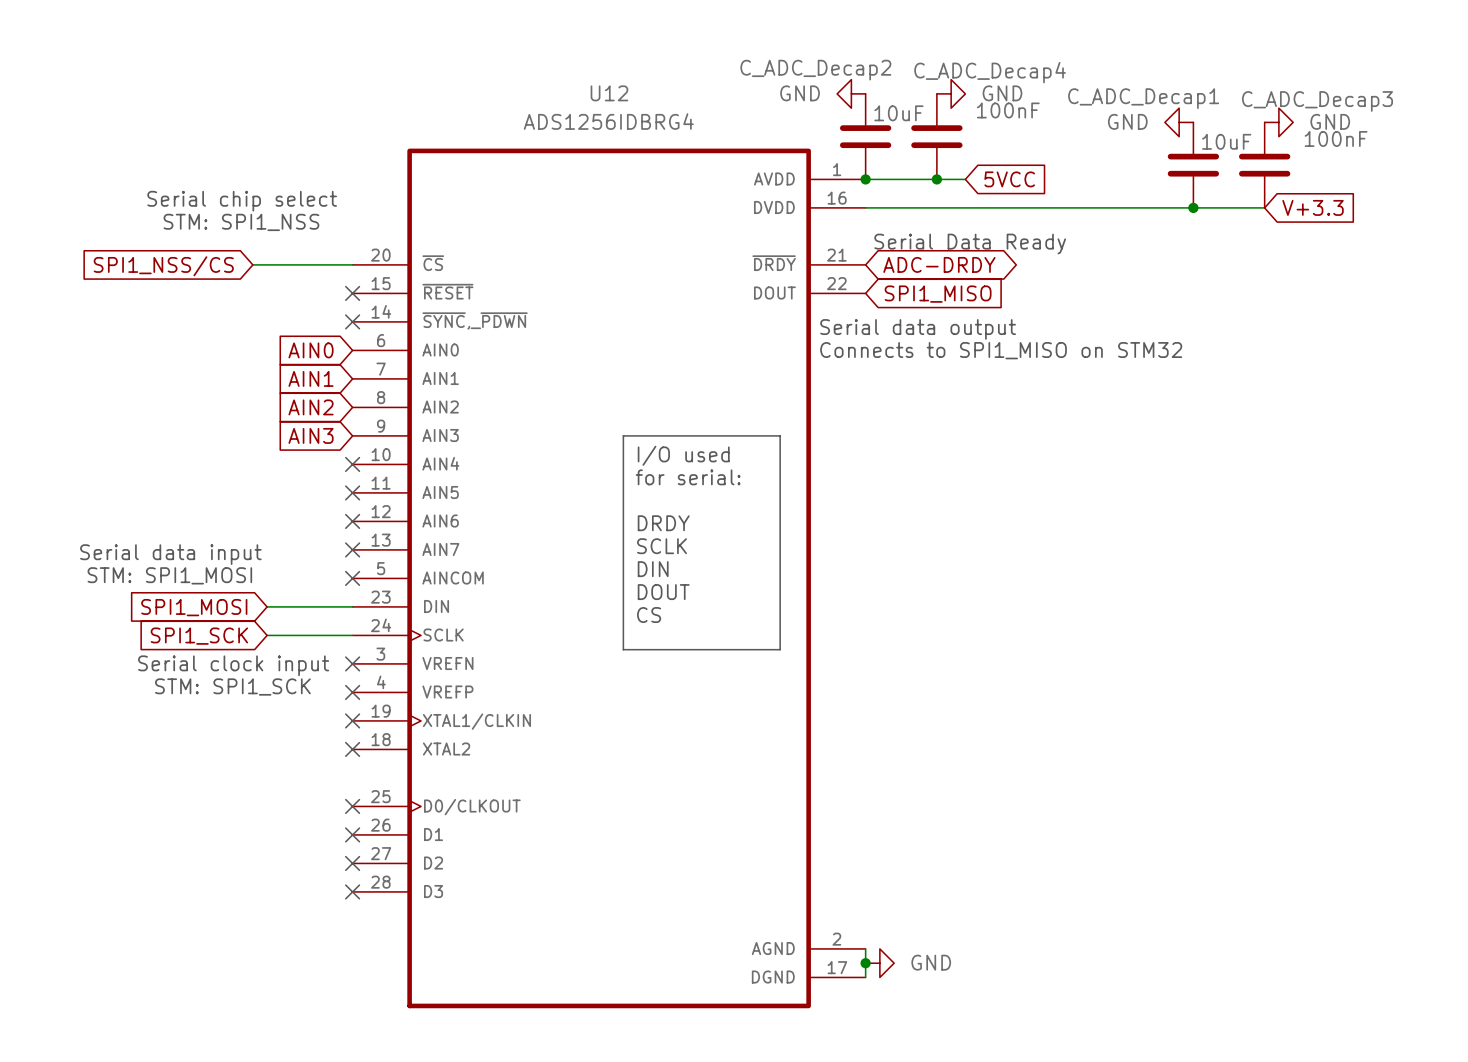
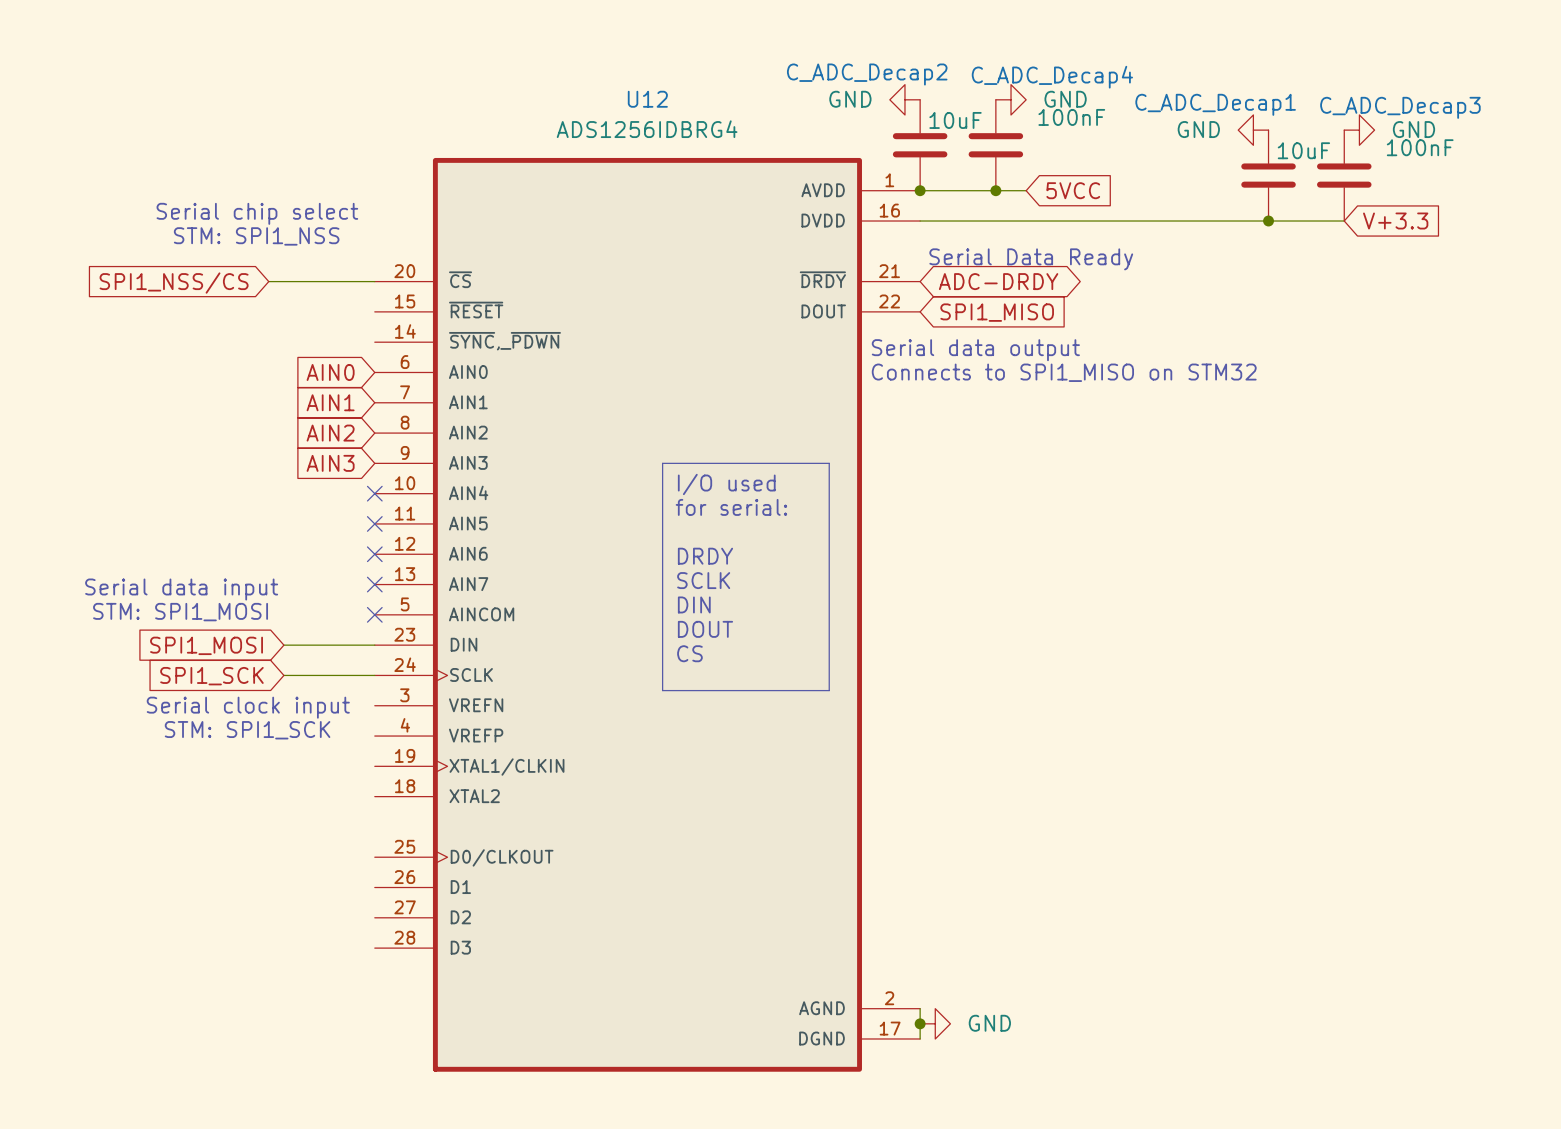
no-connect mark: (352, 293) -> none
no-connect mark: (352, 321) -> none
no-connect mark: (352, 663) -> none
no-connect mark: (352, 692) -> none
no-connect mark: (352, 720) -> none
no-connect mark: (352, 749) -> none
no-connect mark: (352, 806) -> none
no-connect mark: (352, 834) -> none
no-connect mark: (352, 863) -> none
no-connect mark: (352, 891) -> none

